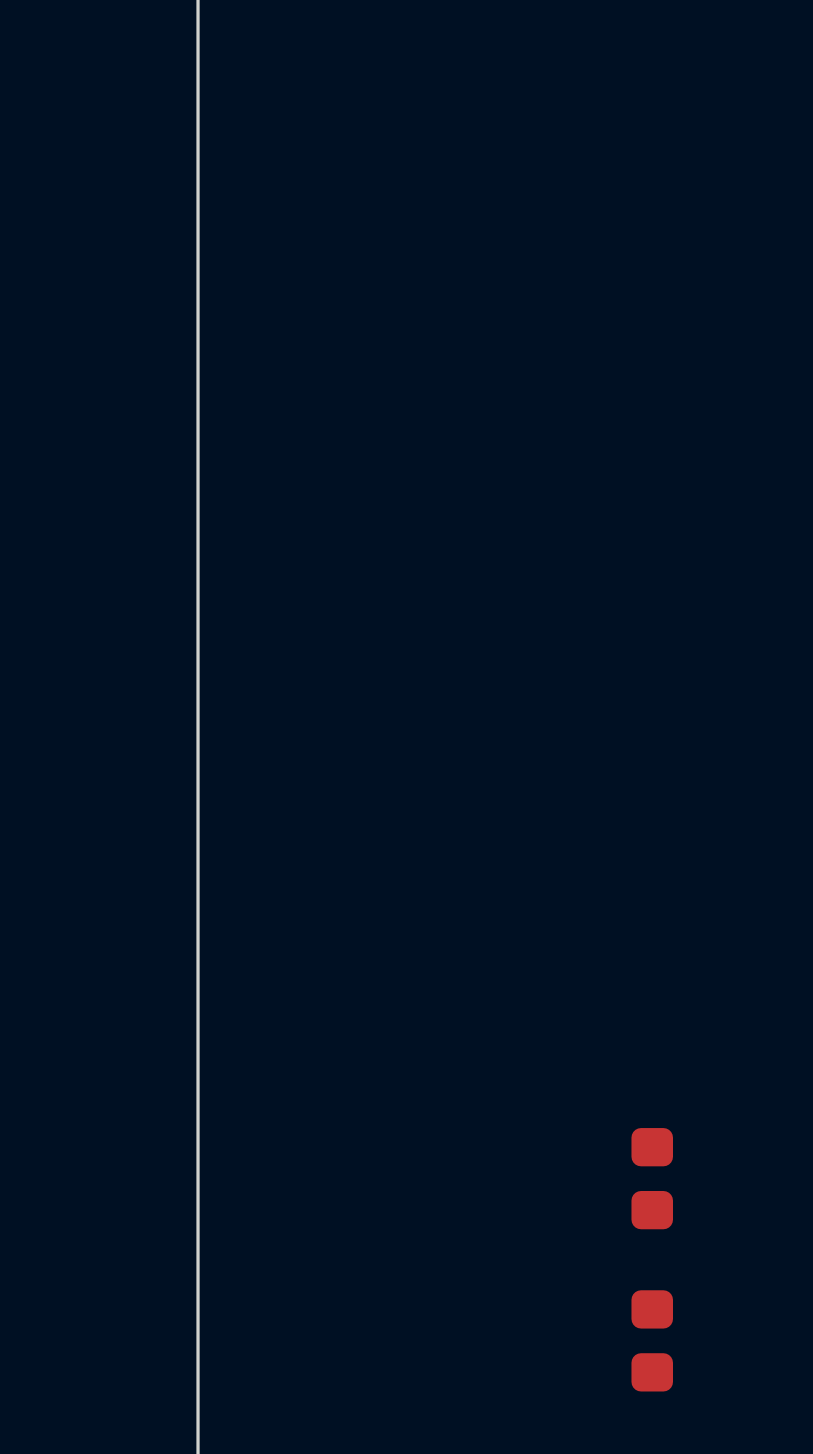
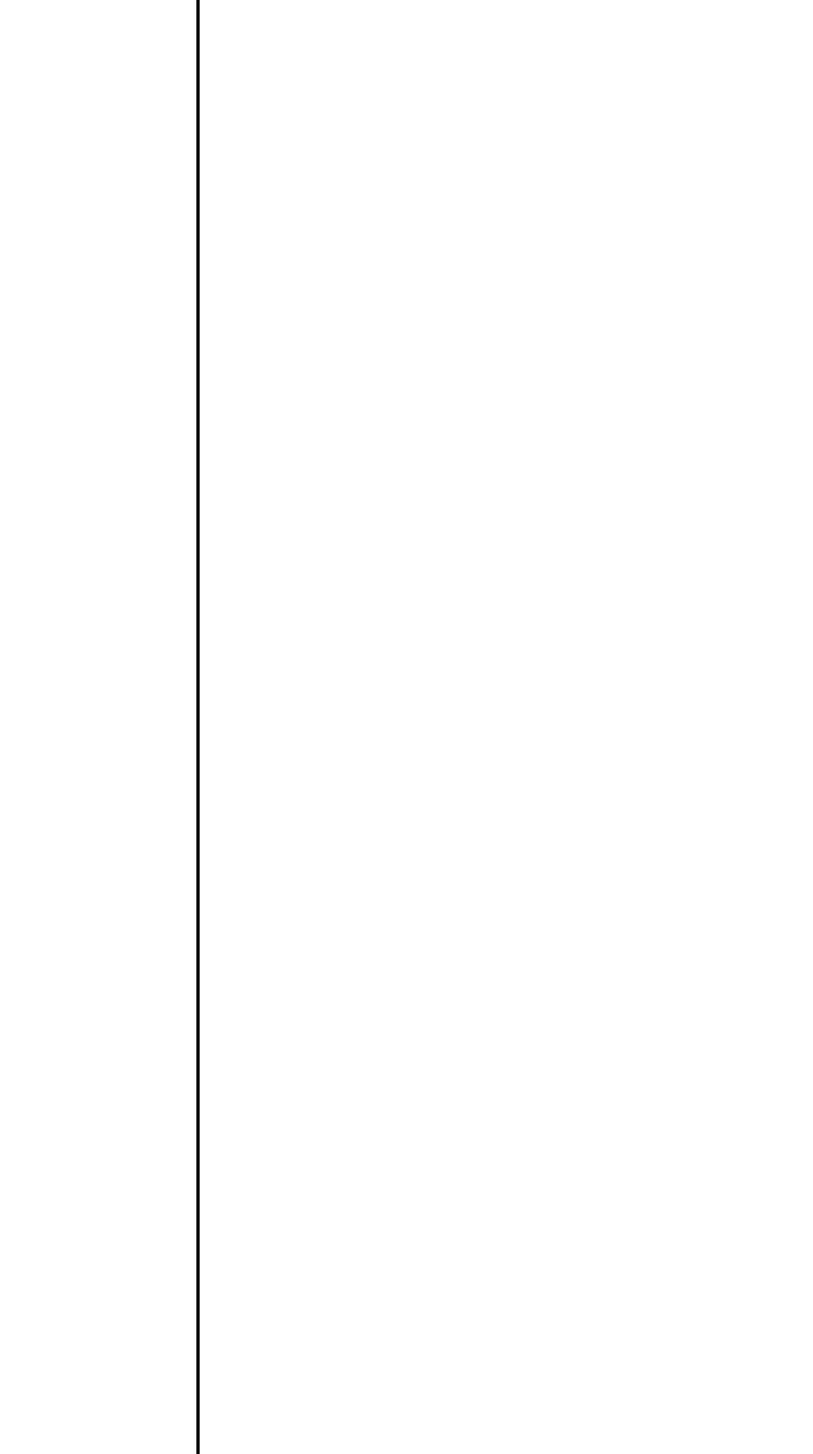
part: (652, 1178) -> none
part: (652, 1340) -> none

